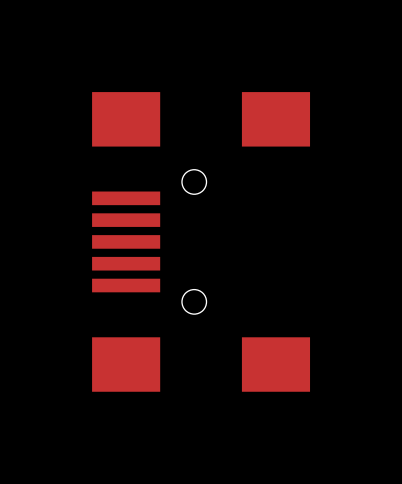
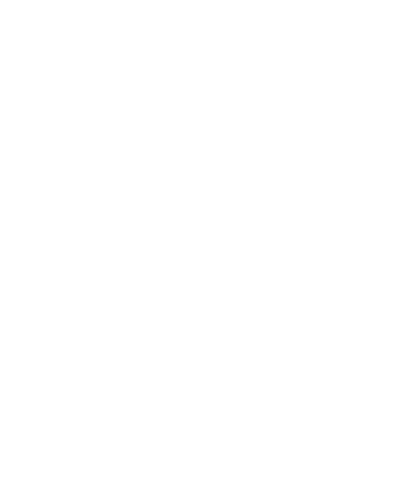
part: (201, 241) -> none

